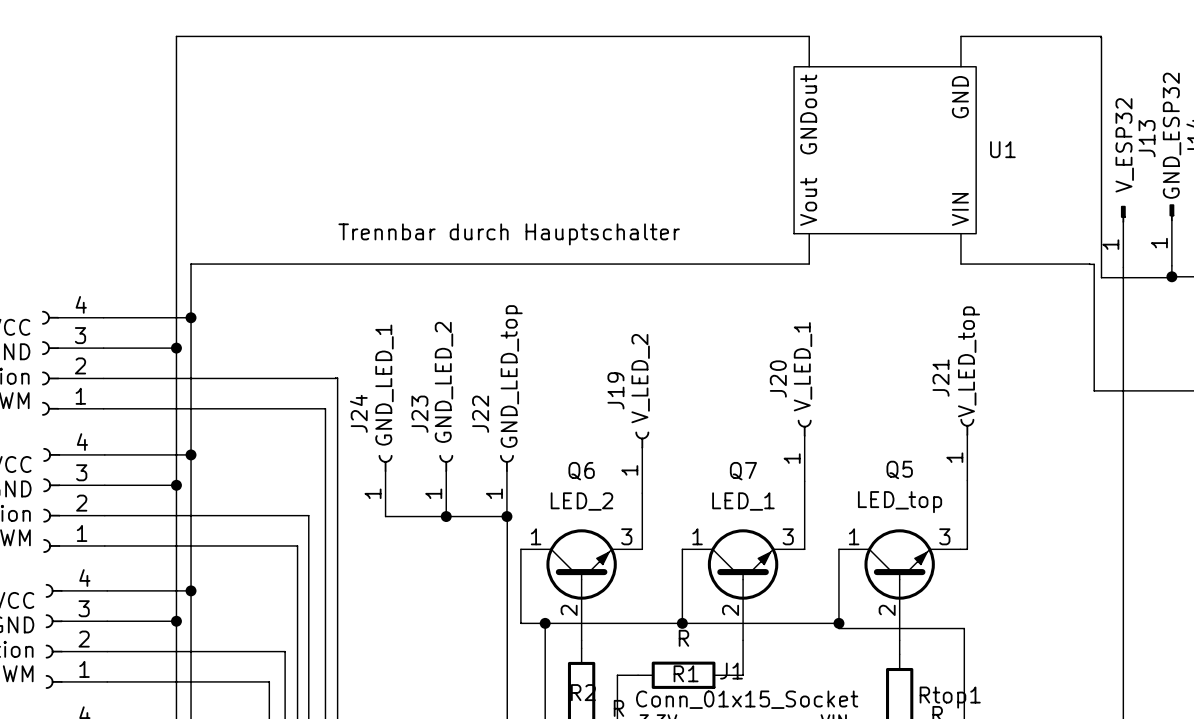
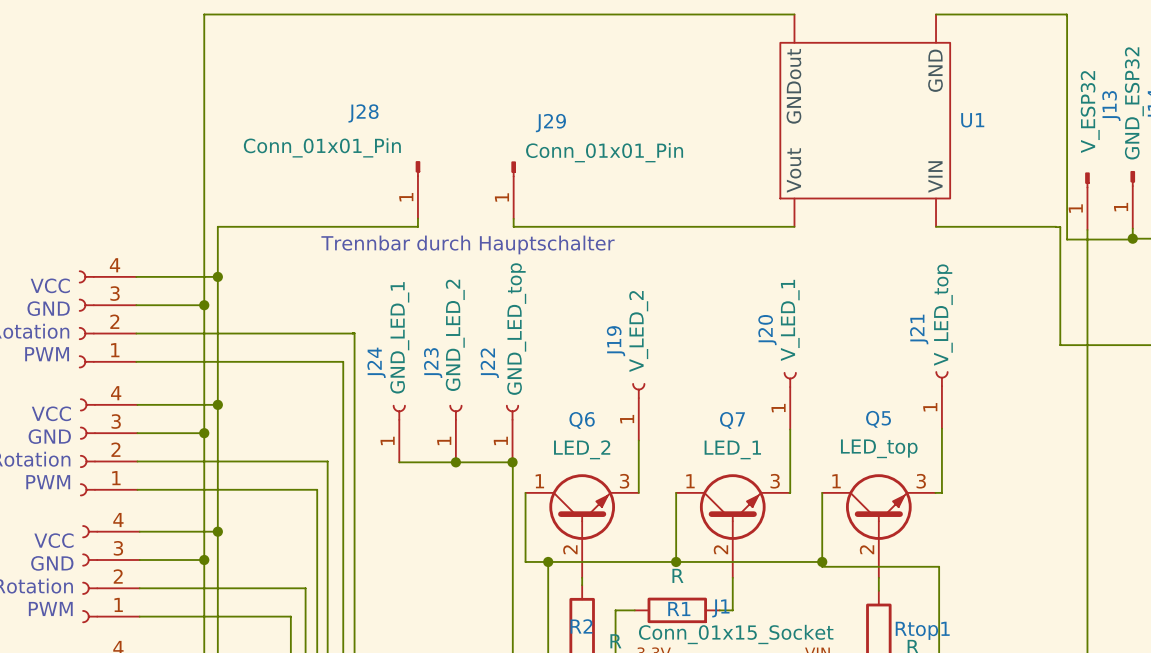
J28: none -> Conn_01x01_Pin (417, 189)
J29: none -> Conn_01x01_Pin (513, 190)
text position: Trennbar durch Hauptschalter (509, 234) -> Trennbar durch Hauptschalter (468, 244)
wire: none -> (417, 218) (417, 226)
wire: (405, 264) (508, 264) -> (513, 218) (513, 226)

